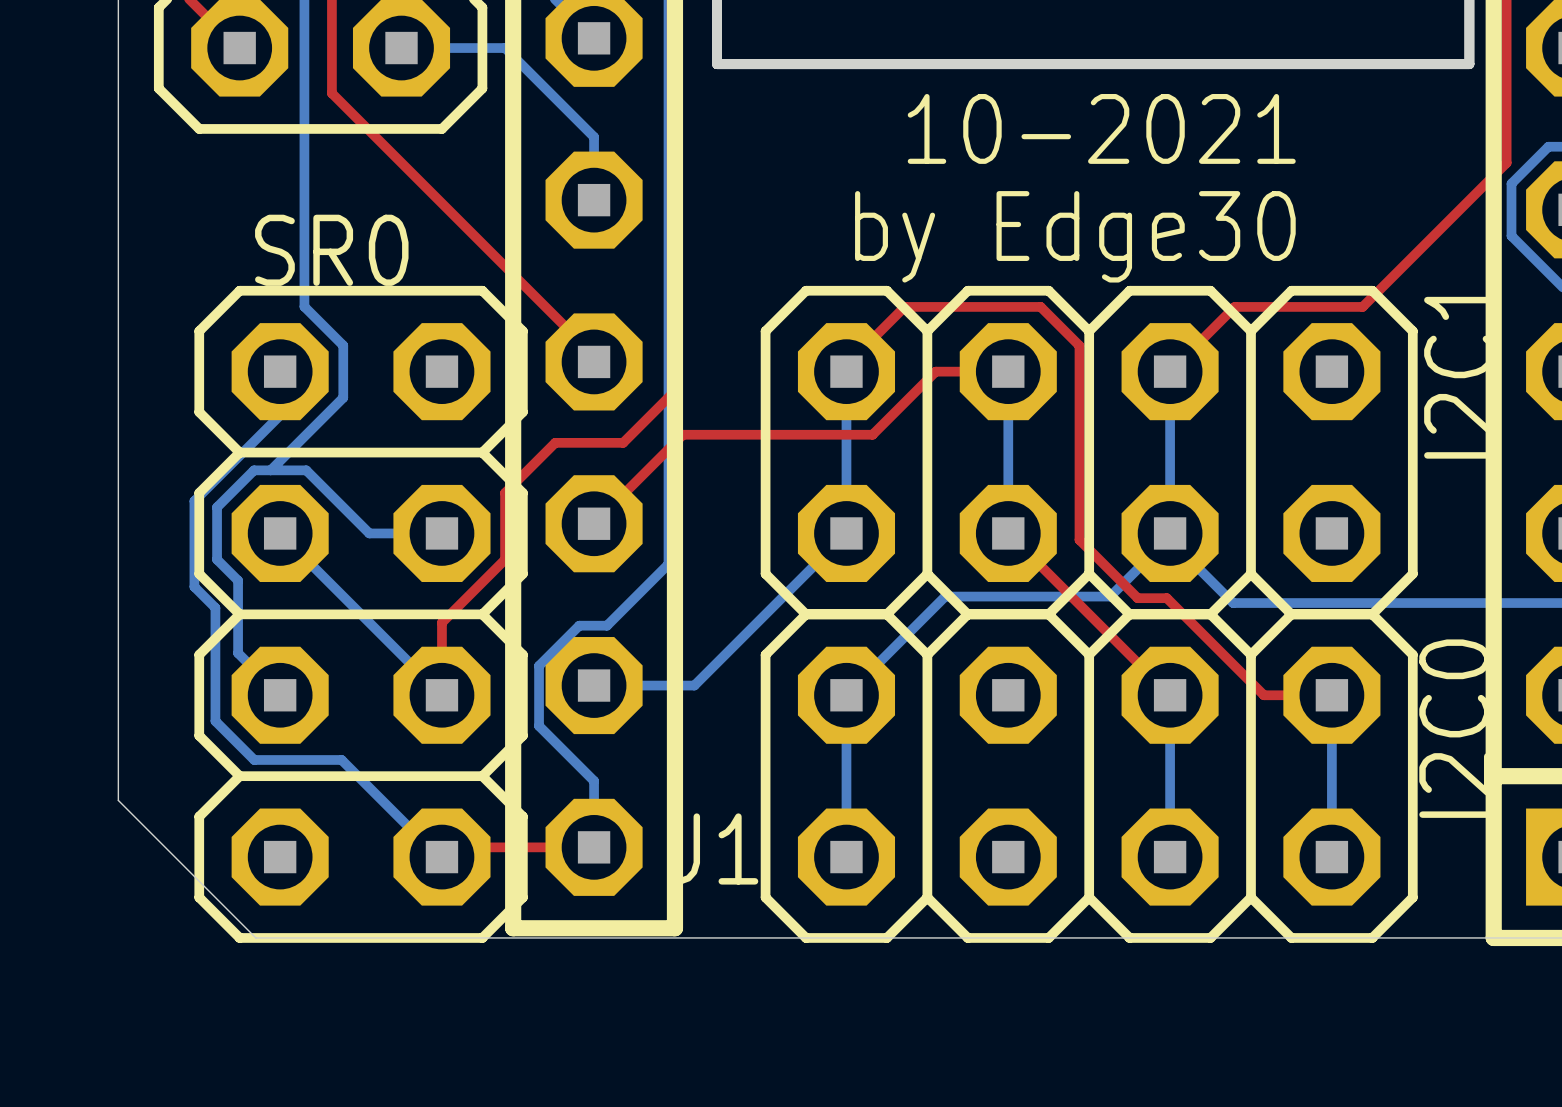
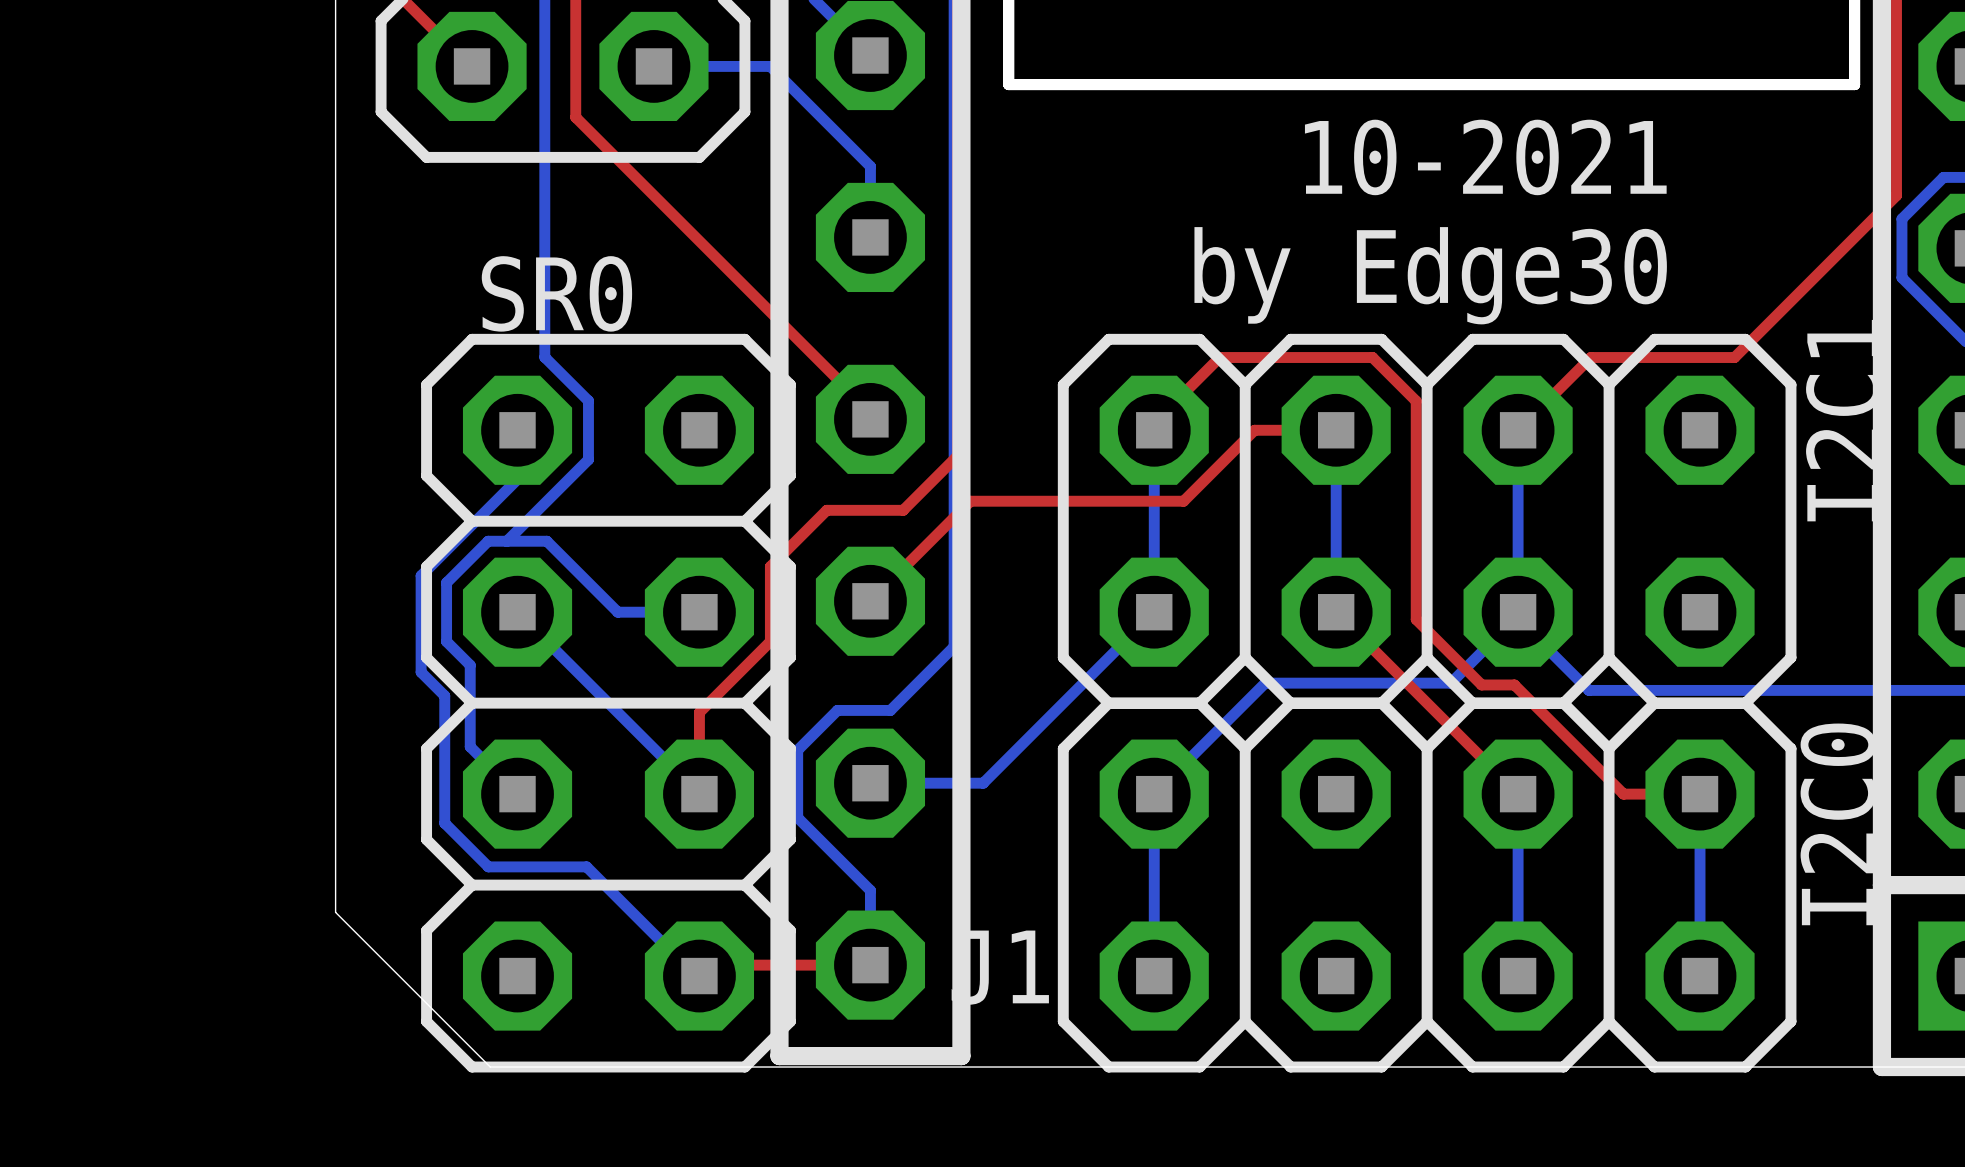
bottom track: (611, 620) (607, 625) (579, 625) (539, 665) (539, 726) -> (890, 710) (837, 710) (797, 750) (797, 817) (808, 828)

